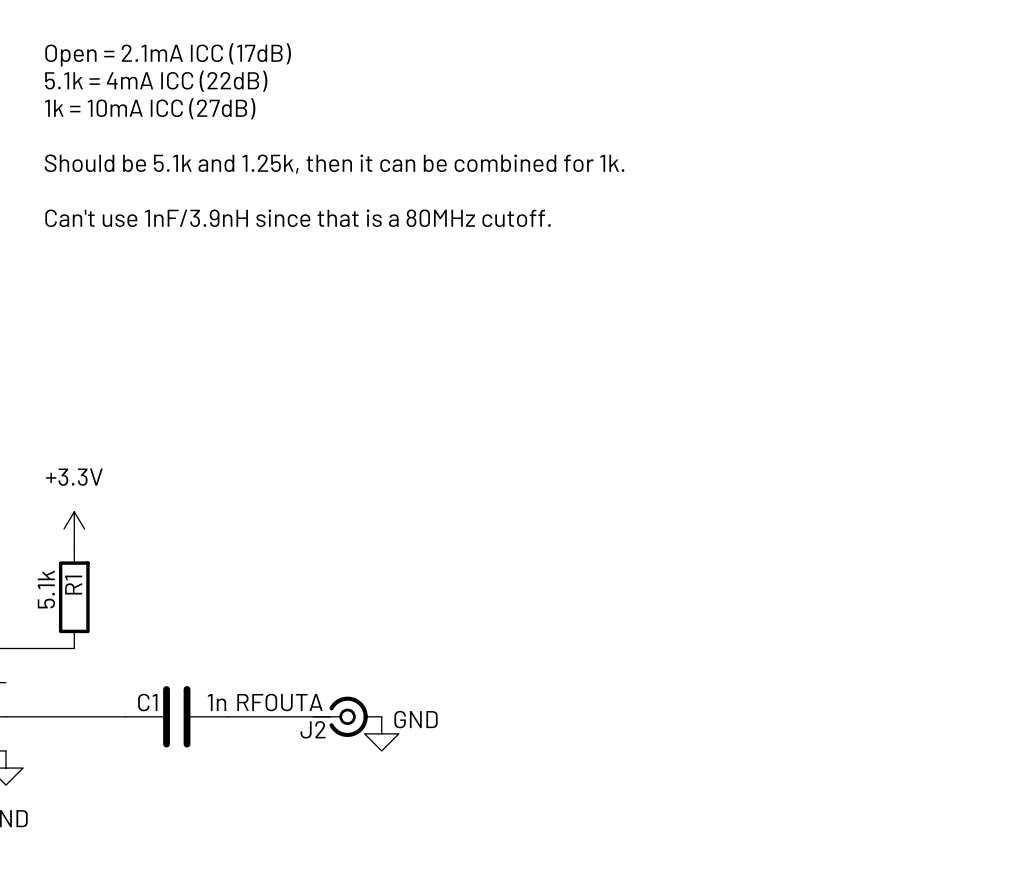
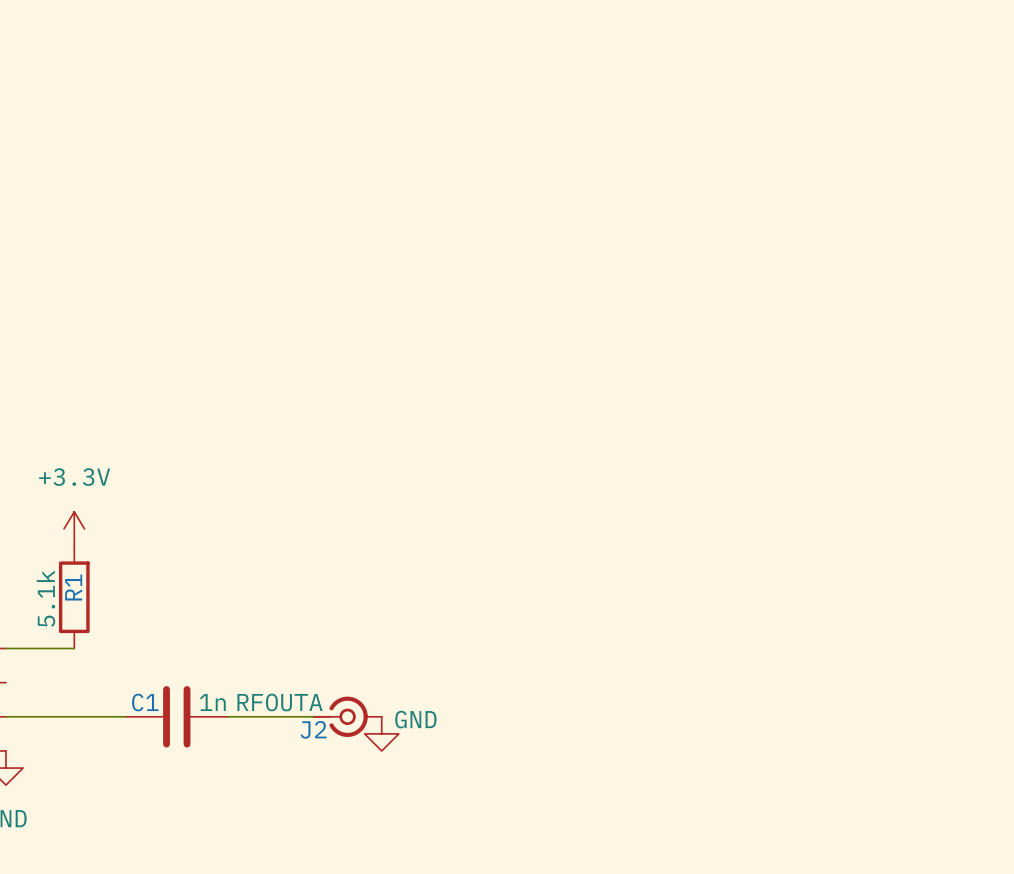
text: Open = 2.1mA ICC (17dB) (168, 54) -> none
text: 5.1k = 4mA ICC (22dB) (156, 81) -> none
text: 1k = 10mA ICC (27dB) (150, 108) -> none
text: Should be 5.1k and 1.25k, then it can be combined for 1k. (334, 164) -> none
text: Can't use 1nF/3.9nH since that is a 80MHz cutoff. (298, 218) -> none

